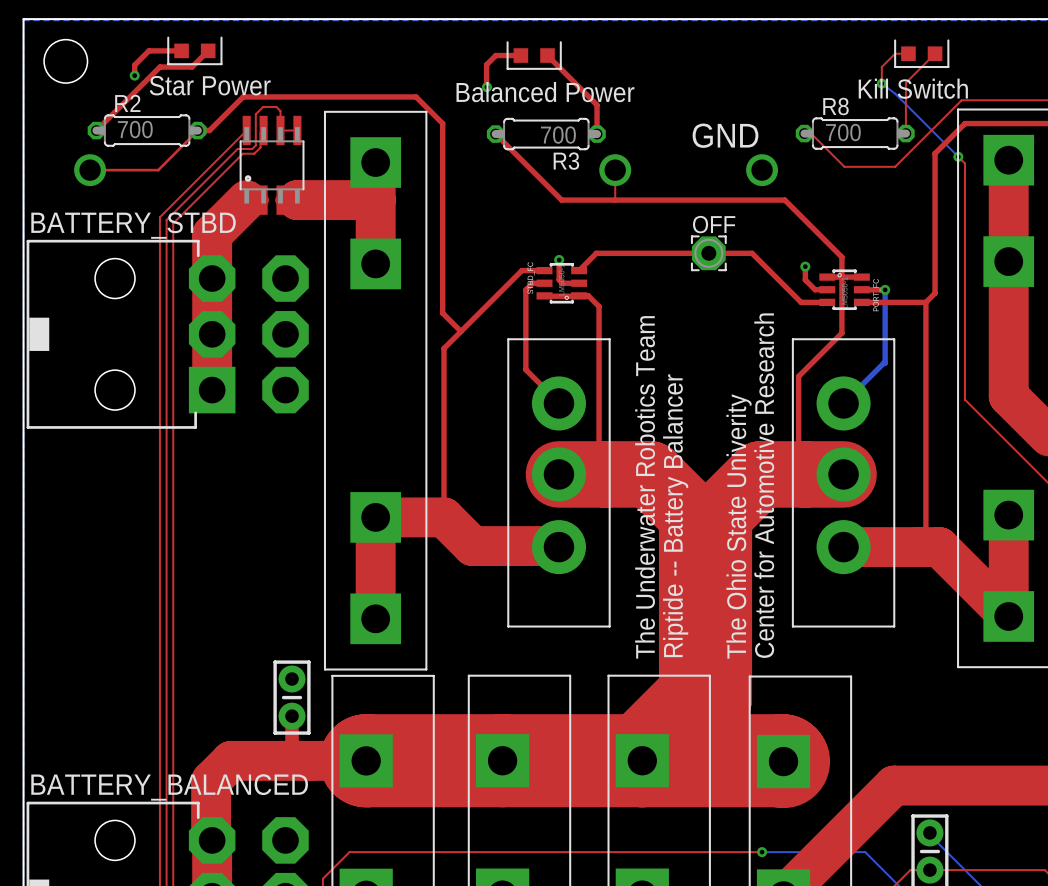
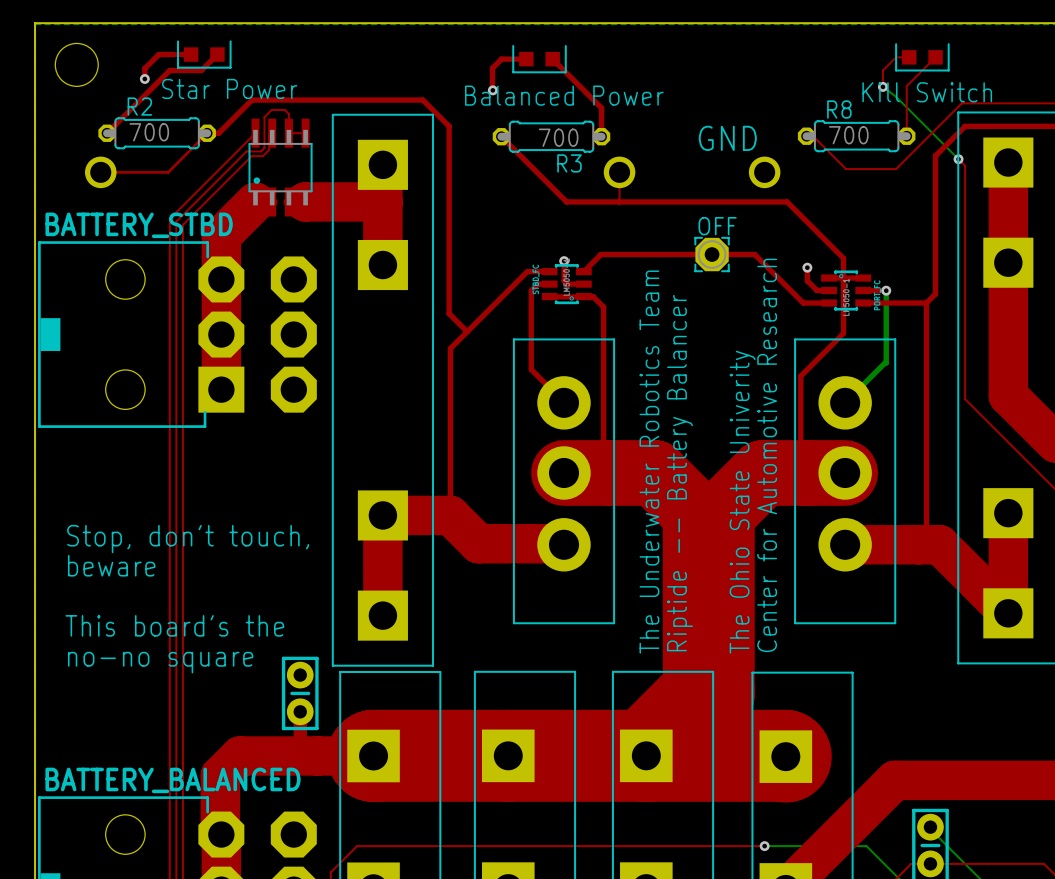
text: none -> Stop, don't touch, (188, 539)
text: none -> beware (111, 565)
text: none -> This board's the (174, 625)
text: none -> no-no square (160, 662)

